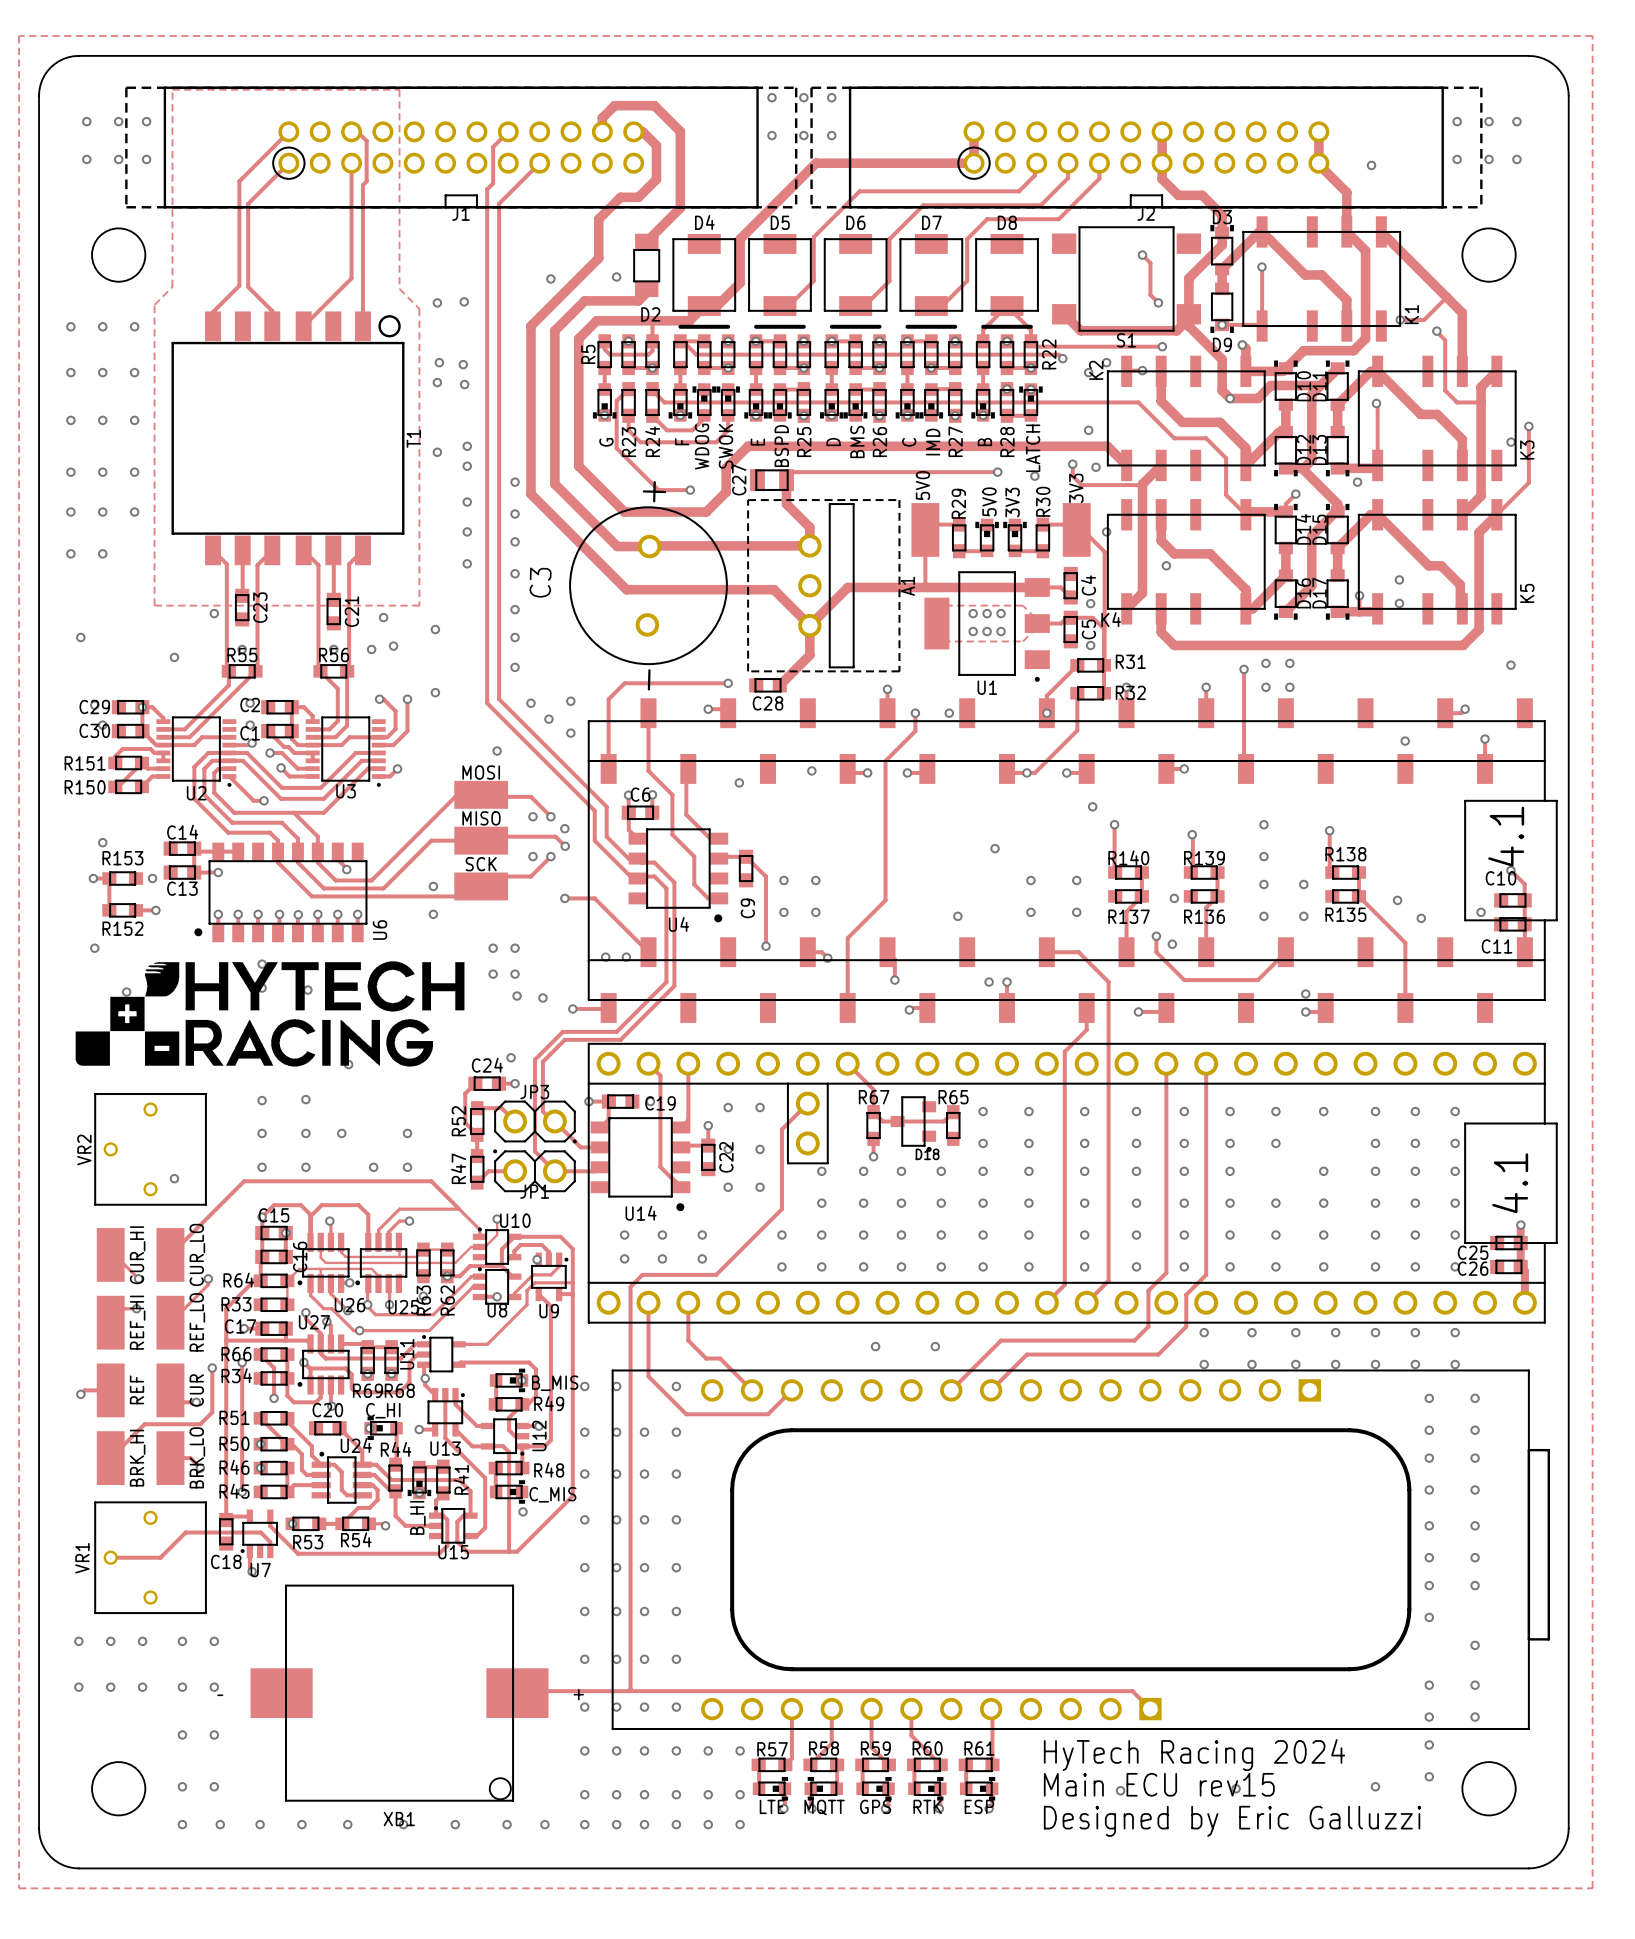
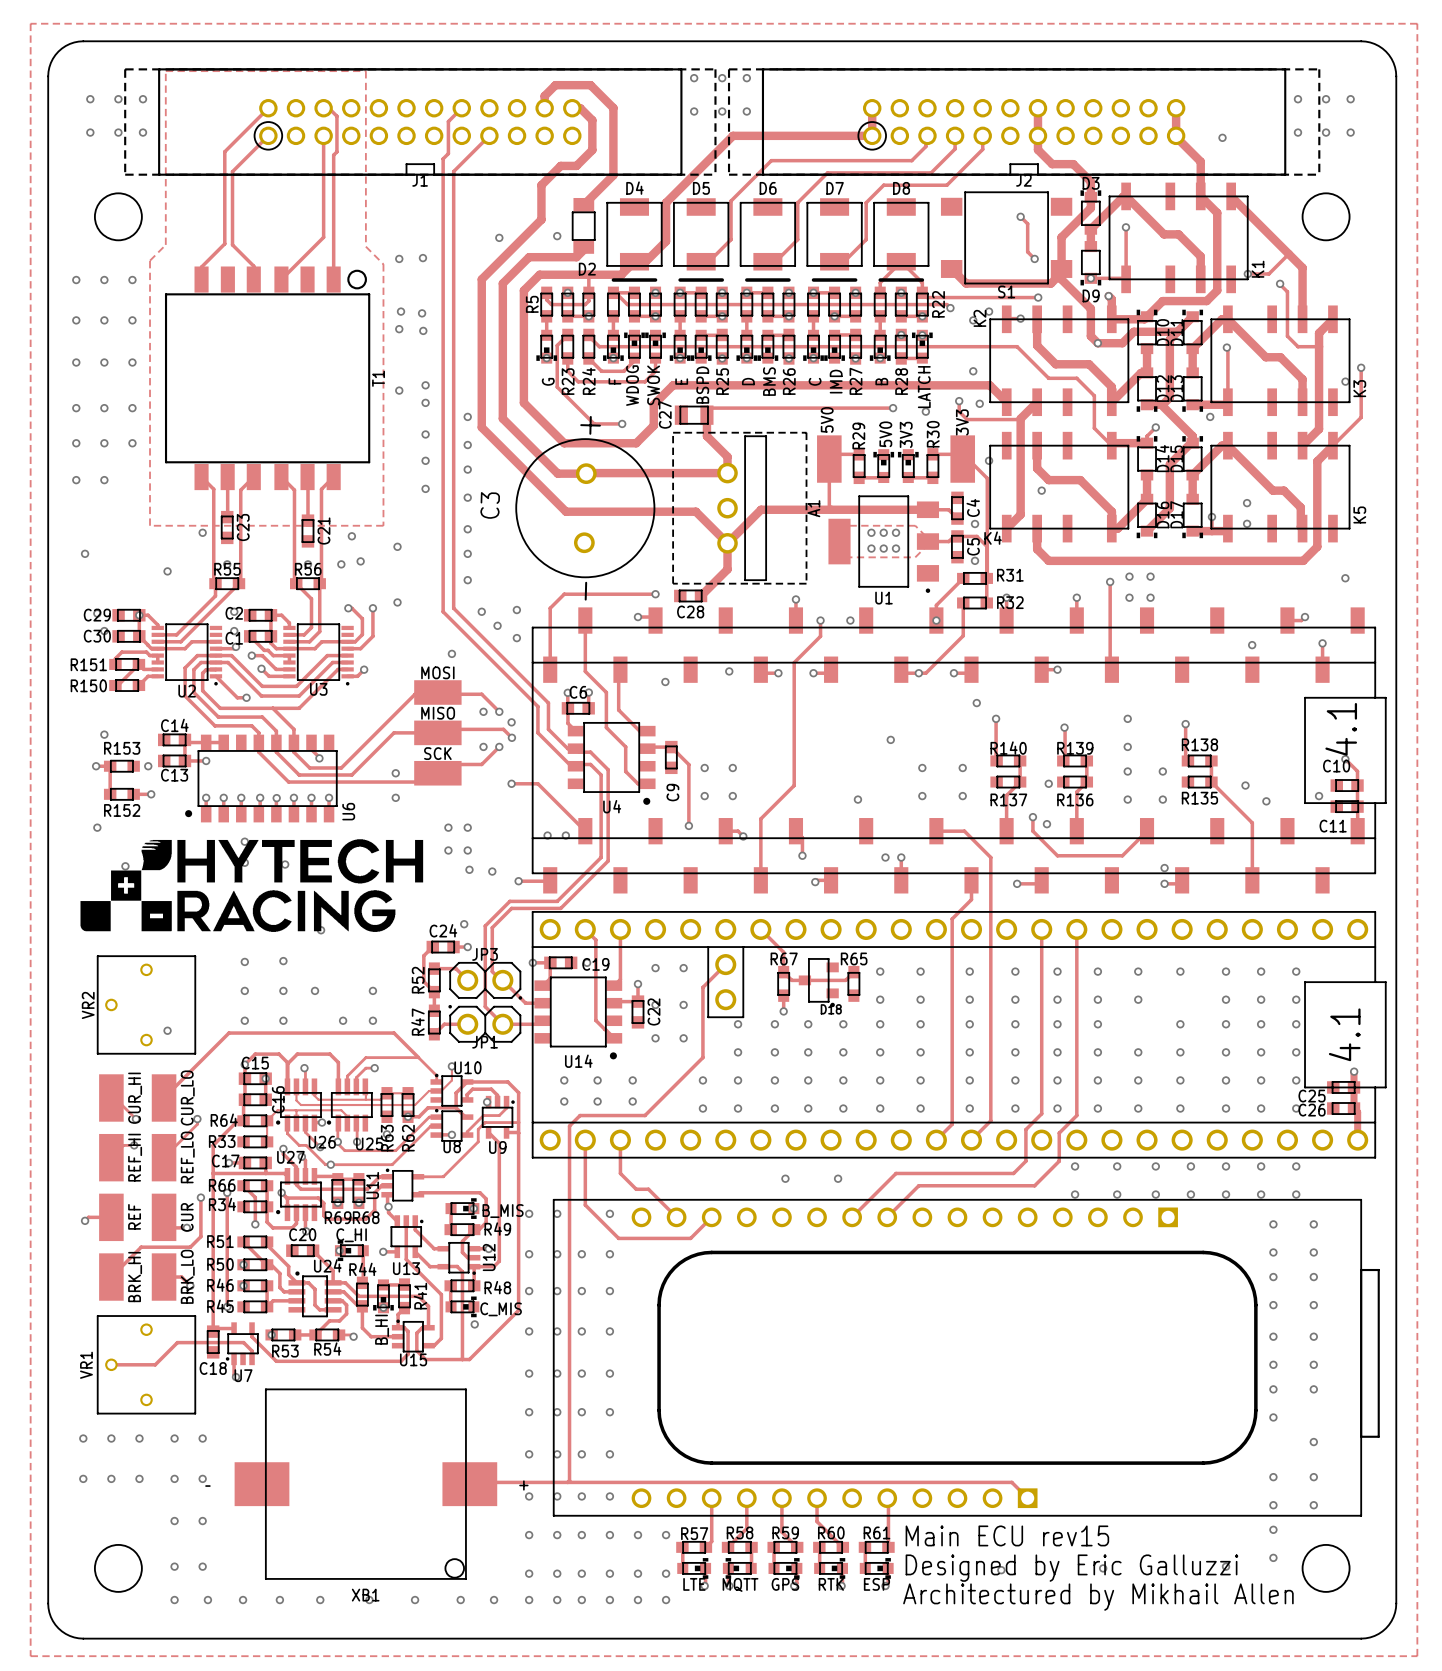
text: HyTech Racing 2024 (1194, 1755) -> none
text position: Main ECU rev15 (1159, 1784) -> Main ECU rev15 (1007, 1535)
text: none -> Architectured by Mikhail Allen (1098, 1597)
text position: Designed by Eric Galluzzi (1232, 1821) -> Designed by Eric Galluzzi (1071, 1568)

